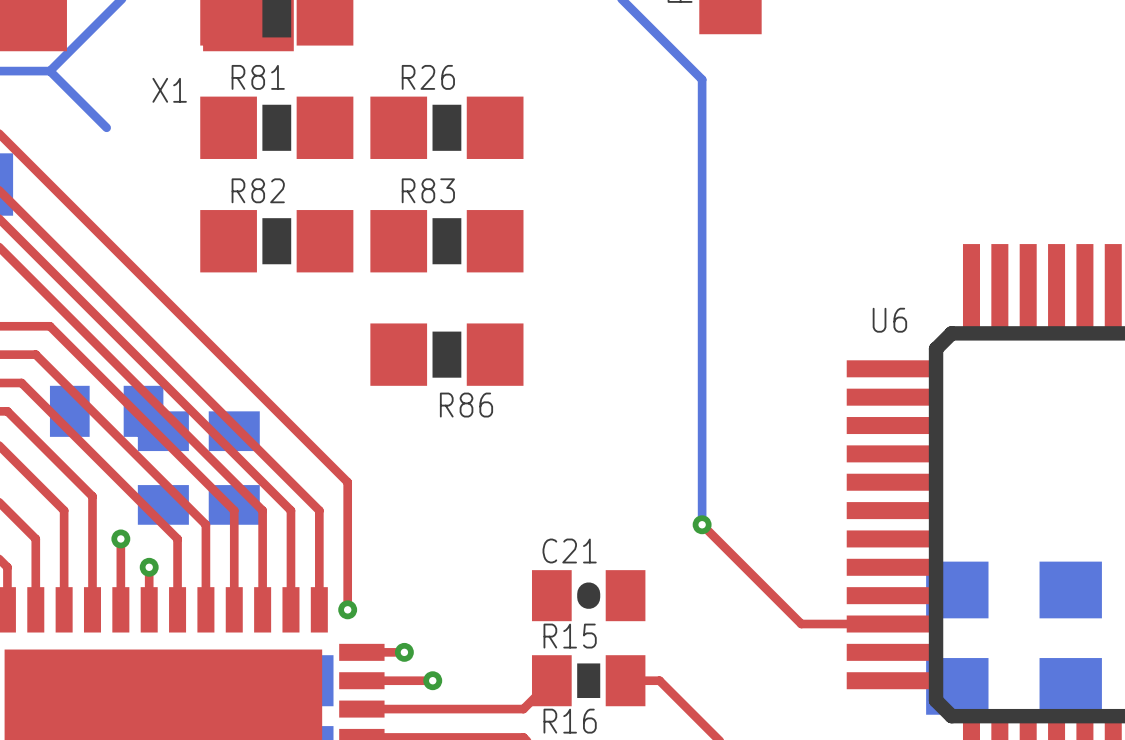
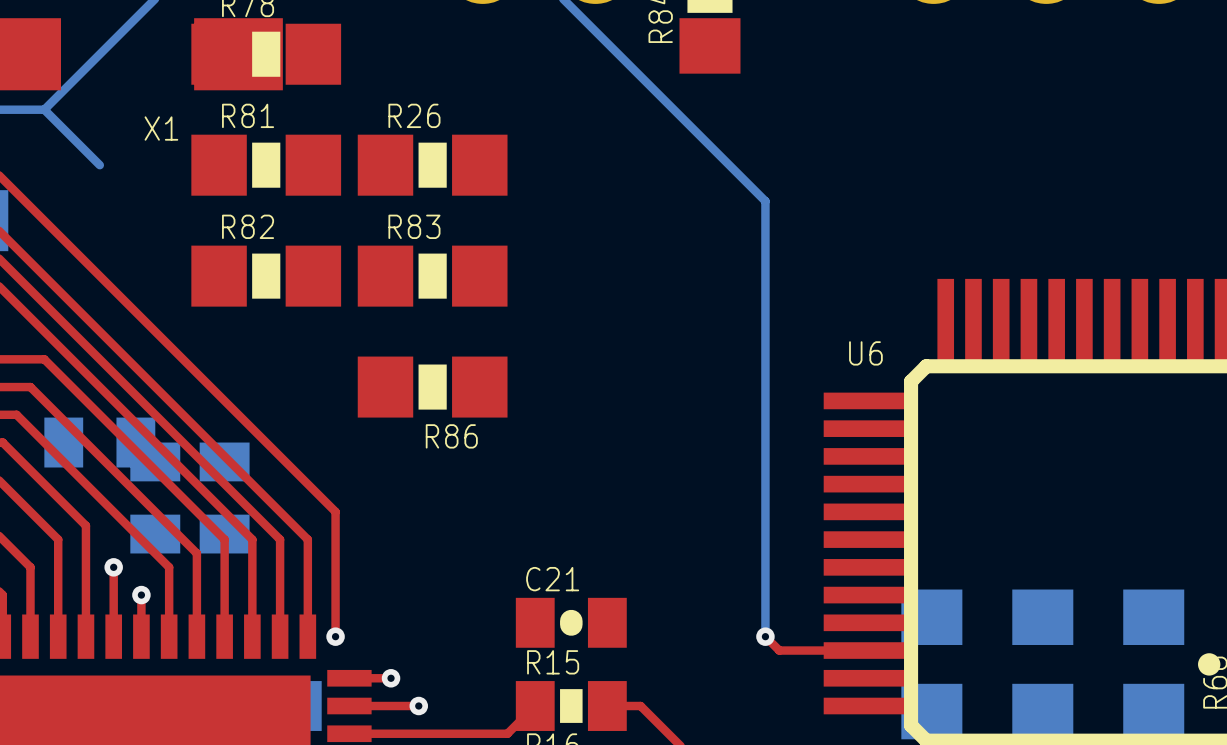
bottom track: (702, 79) (702, 524) -> (682, 118) (765, 201) (765, 636)
top track: (702, 524) (787, 609) -> none
via position: (702, 524) -> (765, 636)

